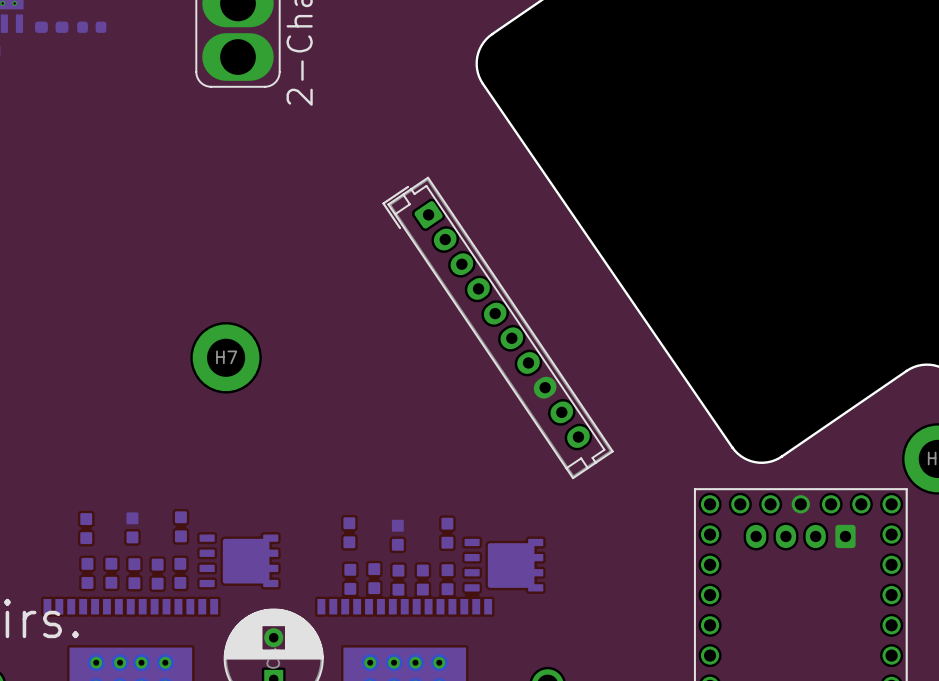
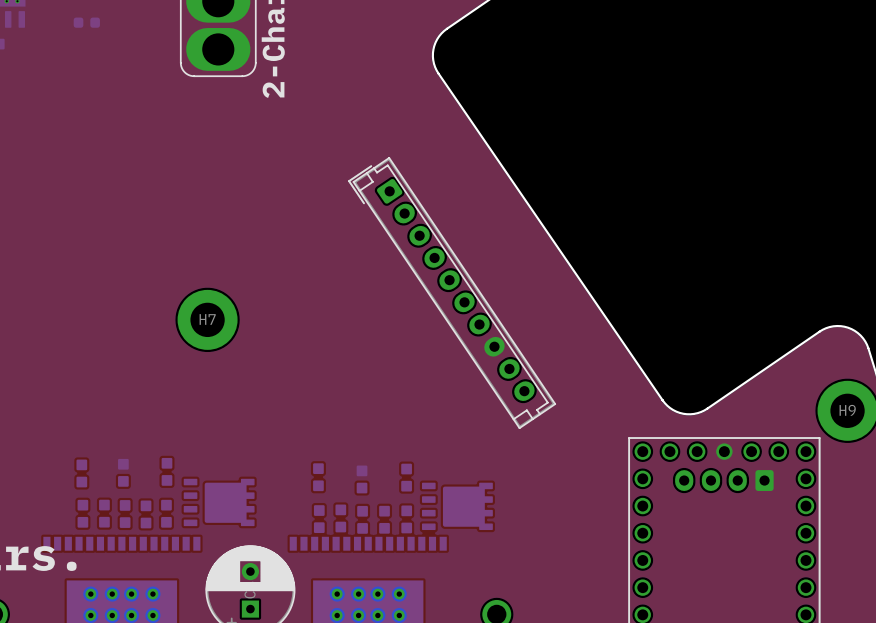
part: (51, 27) -> none

